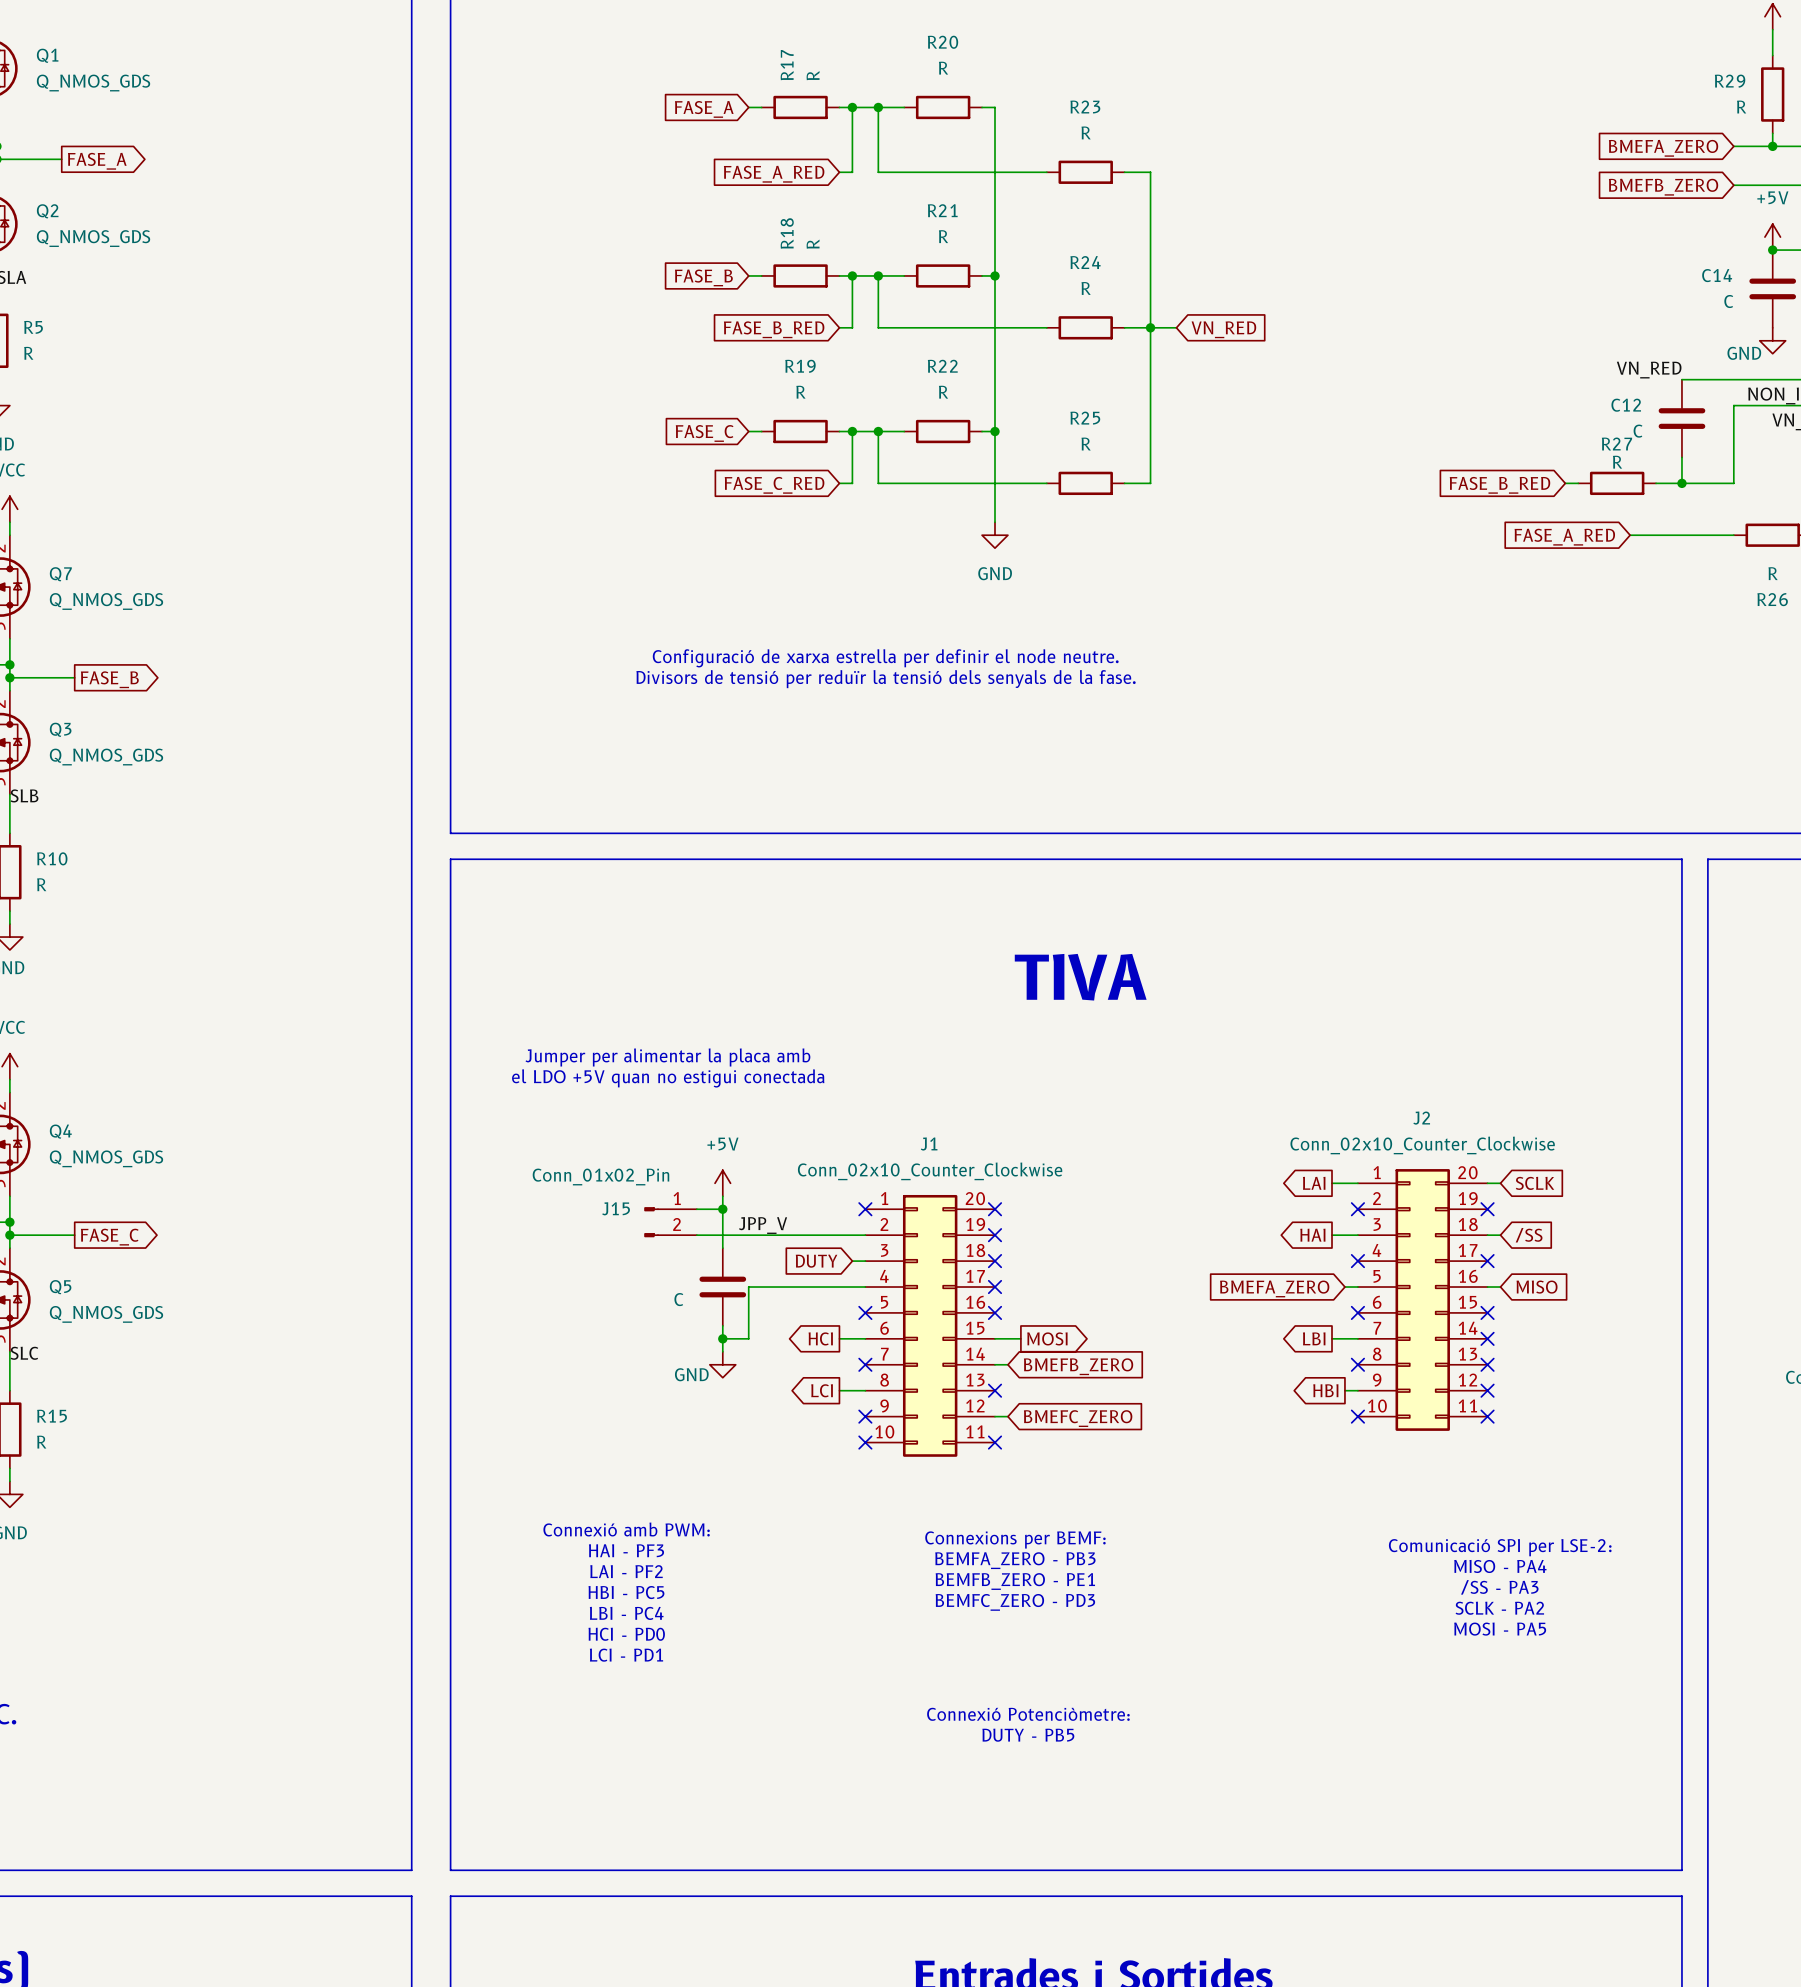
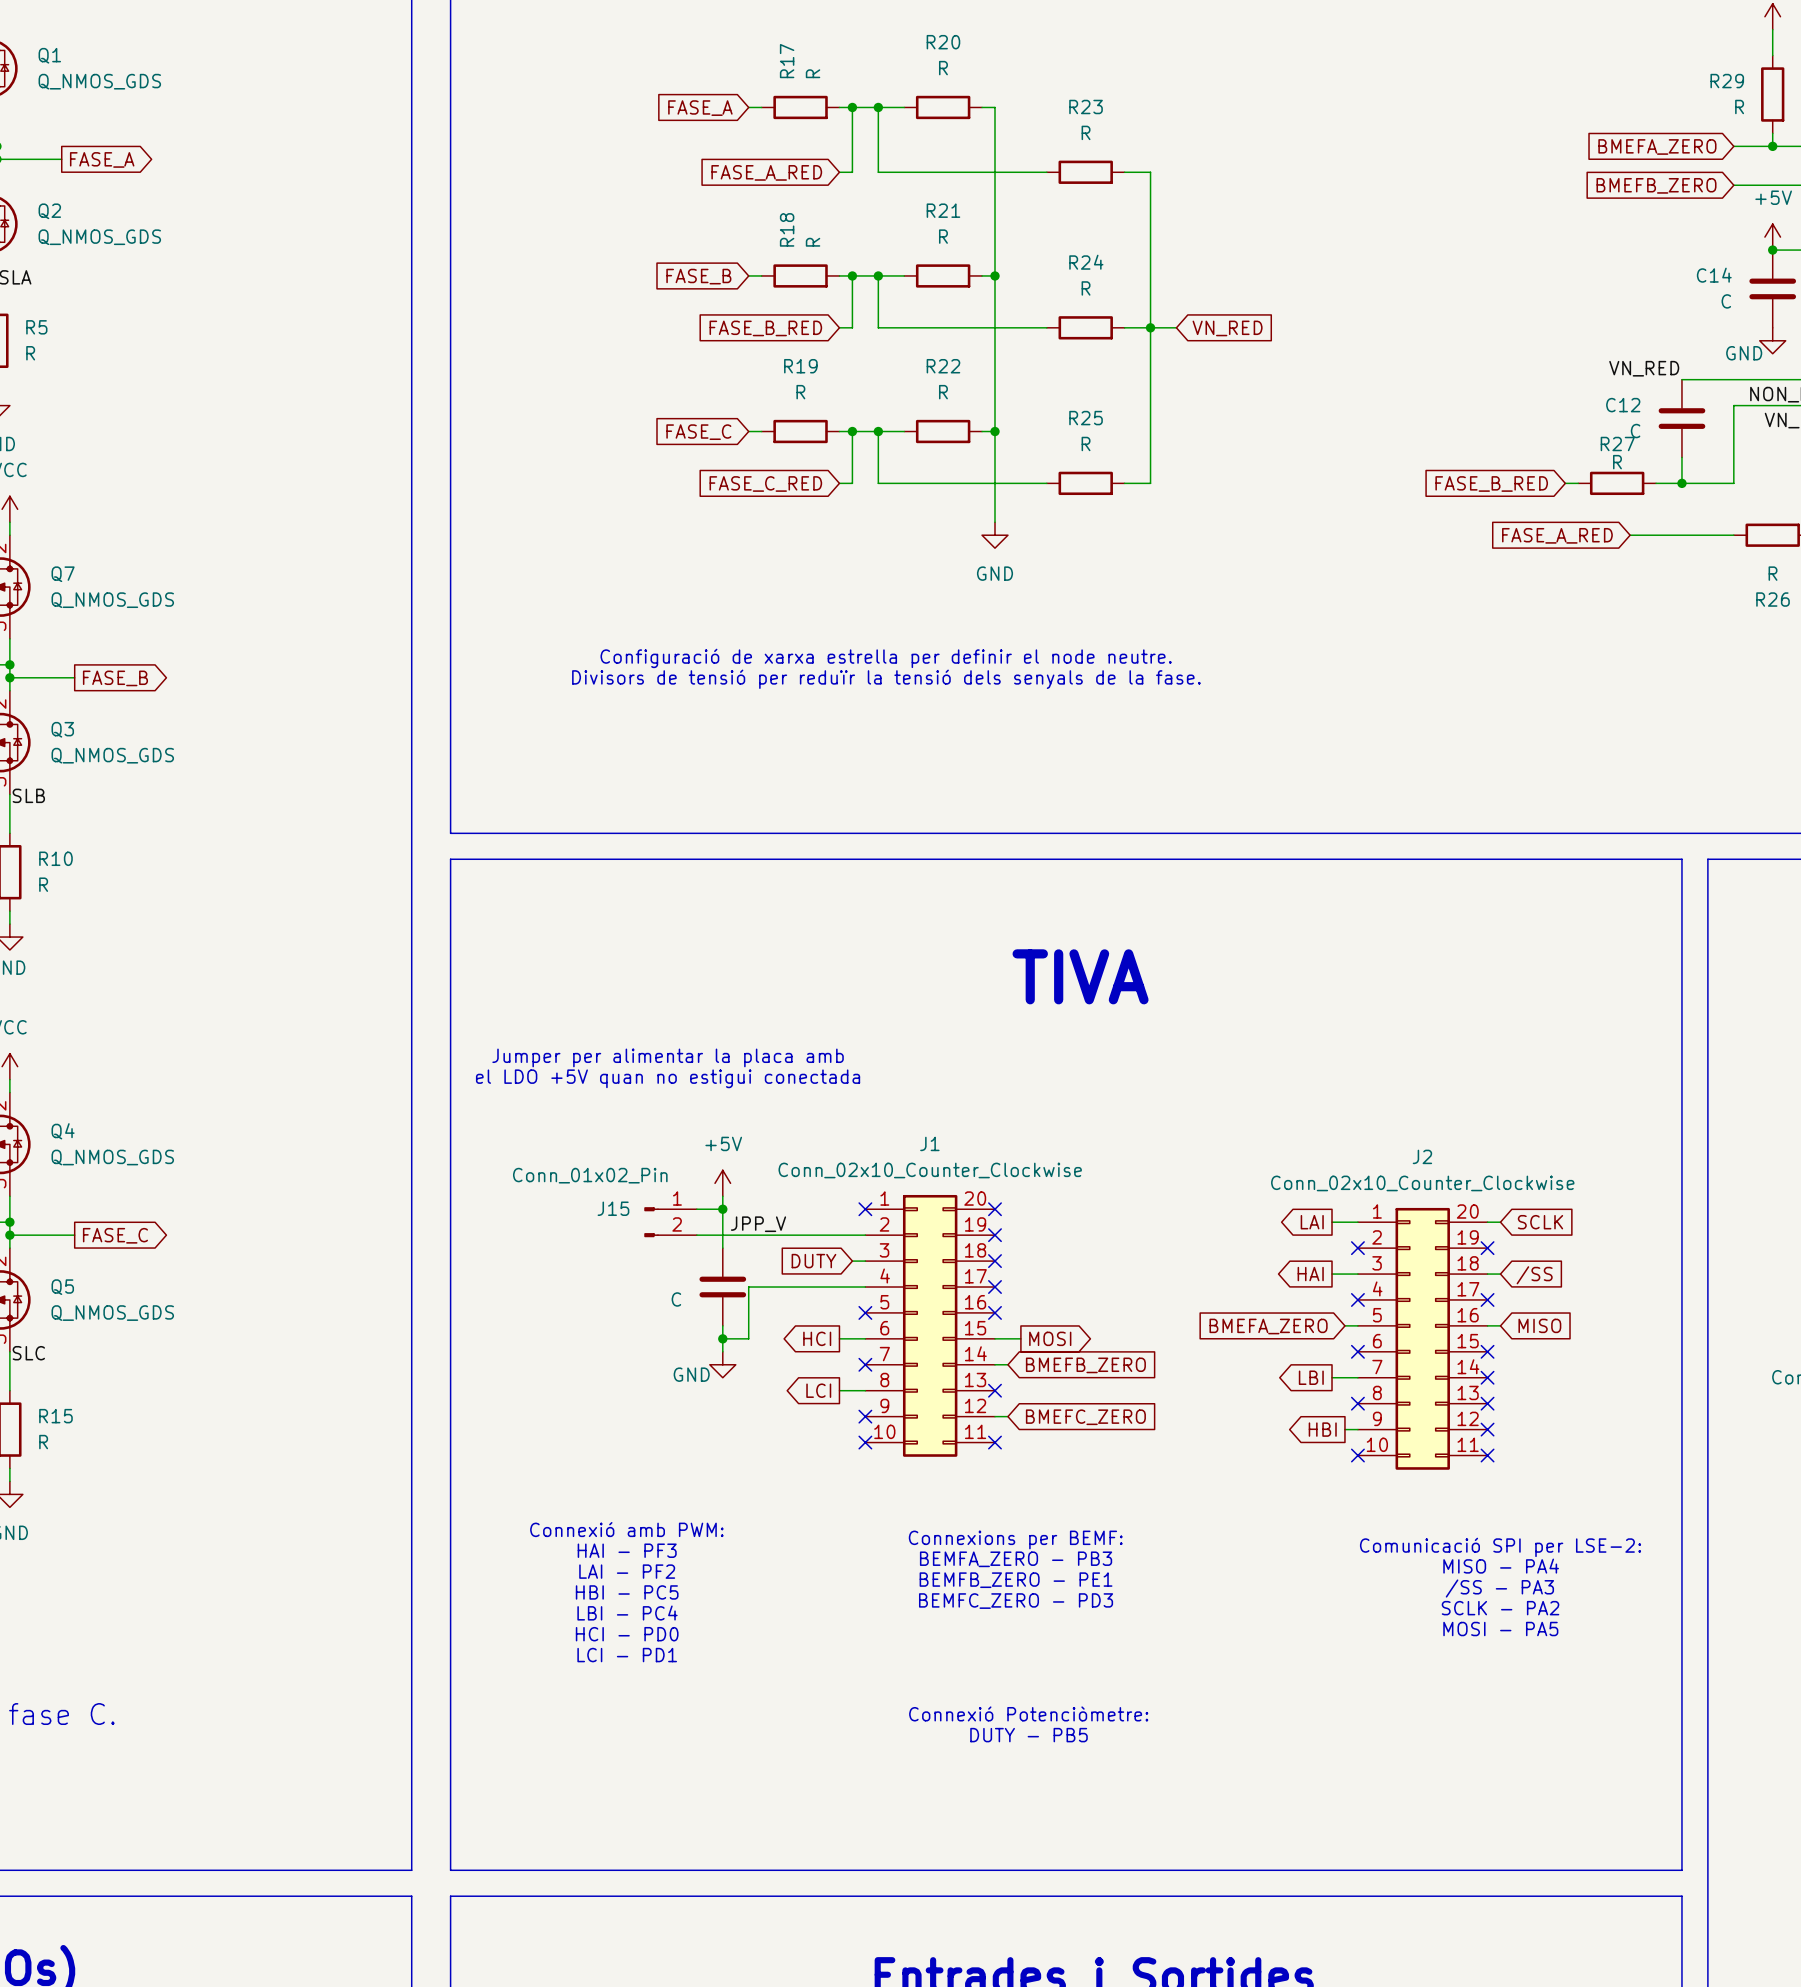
global label position: LAI (1314, 1183) -> LAI (1312, 1222)
wire: (1332, 1183) (1357, 1183) -> (1332, 1222) (1357, 1222)
wire: (1487, 1183) (1500, 1183) -> (1487, 1222) (1500, 1222)
global label position: SCLK (1535, 1183) -> SCLK (1540, 1222)
no-connect mark: (1357, 1209) -> none
no-connect mark: (1487, 1209) -> none
global label position: HAI (1312, 1235) -> HAI (1310, 1274)
wire: (1332, 1235) (1357, 1235) -> (1332, 1274) (1357, 1274)
wire: (1487, 1235) (1500, 1235) -> (1487, 1274) (1500, 1274)
global label position: /SS (1529, 1235) -> /SS (1534, 1275)
no-connect mark position: (1357, 1261) -> (1357, 1248)
no-connect mark position: (1487, 1261) -> (1487, 1248)
wire: (1344, 1287) (1357, 1287) -> (1344, 1325) (1357, 1325)
wire: (1487, 1287) (1500, 1287) -> (1487, 1325) (1500, 1325)
global label position: MISO (1537, 1287) -> MISO (1539, 1325)
global label position: BMEFA_ZERO (1274, 1288) -> BMEFA_ZERO (1268, 1326)
J2 position: (1422, 1299) -> (1422, 1338)
no-connect mark position: (1357, 1312) -> (1357, 1299)
no-connect mark position: (1487, 1312) -> (1487, 1299)
global label position: LBI (1314, 1338) -> LBI (1311, 1377)
wire: (1332, 1338) (1357, 1338) -> (1332, 1377) (1357, 1377)
no-connect mark: (1487, 1338) -> none
no-connect mark: none -> (1487, 1351)
no-connect mark position: (1357, 1364) -> (1357, 1351)
no-connect mark: (1487, 1364) -> none
no-connect mark: none -> (1487, 1377)
global label position: HBI (1325, 1390) -> HBI (1322, 1429)
wire: (1344, 1390) (1357, 1390) -> (1344, 1429) (1357, 1429)
no-connect mark: (1487, 1390) -> none
no-connect mark: none -> (1487, 1403)
no-connect mark position: (1357, 1416) -> (1357, 1403)
no-connect mark: (1487, 1416) -> none
no-connect mark: none -> (1487, 1429)
no-connect mark: none -> (1357, 1455)
no-connect mark: none -> (1487, 1455)

